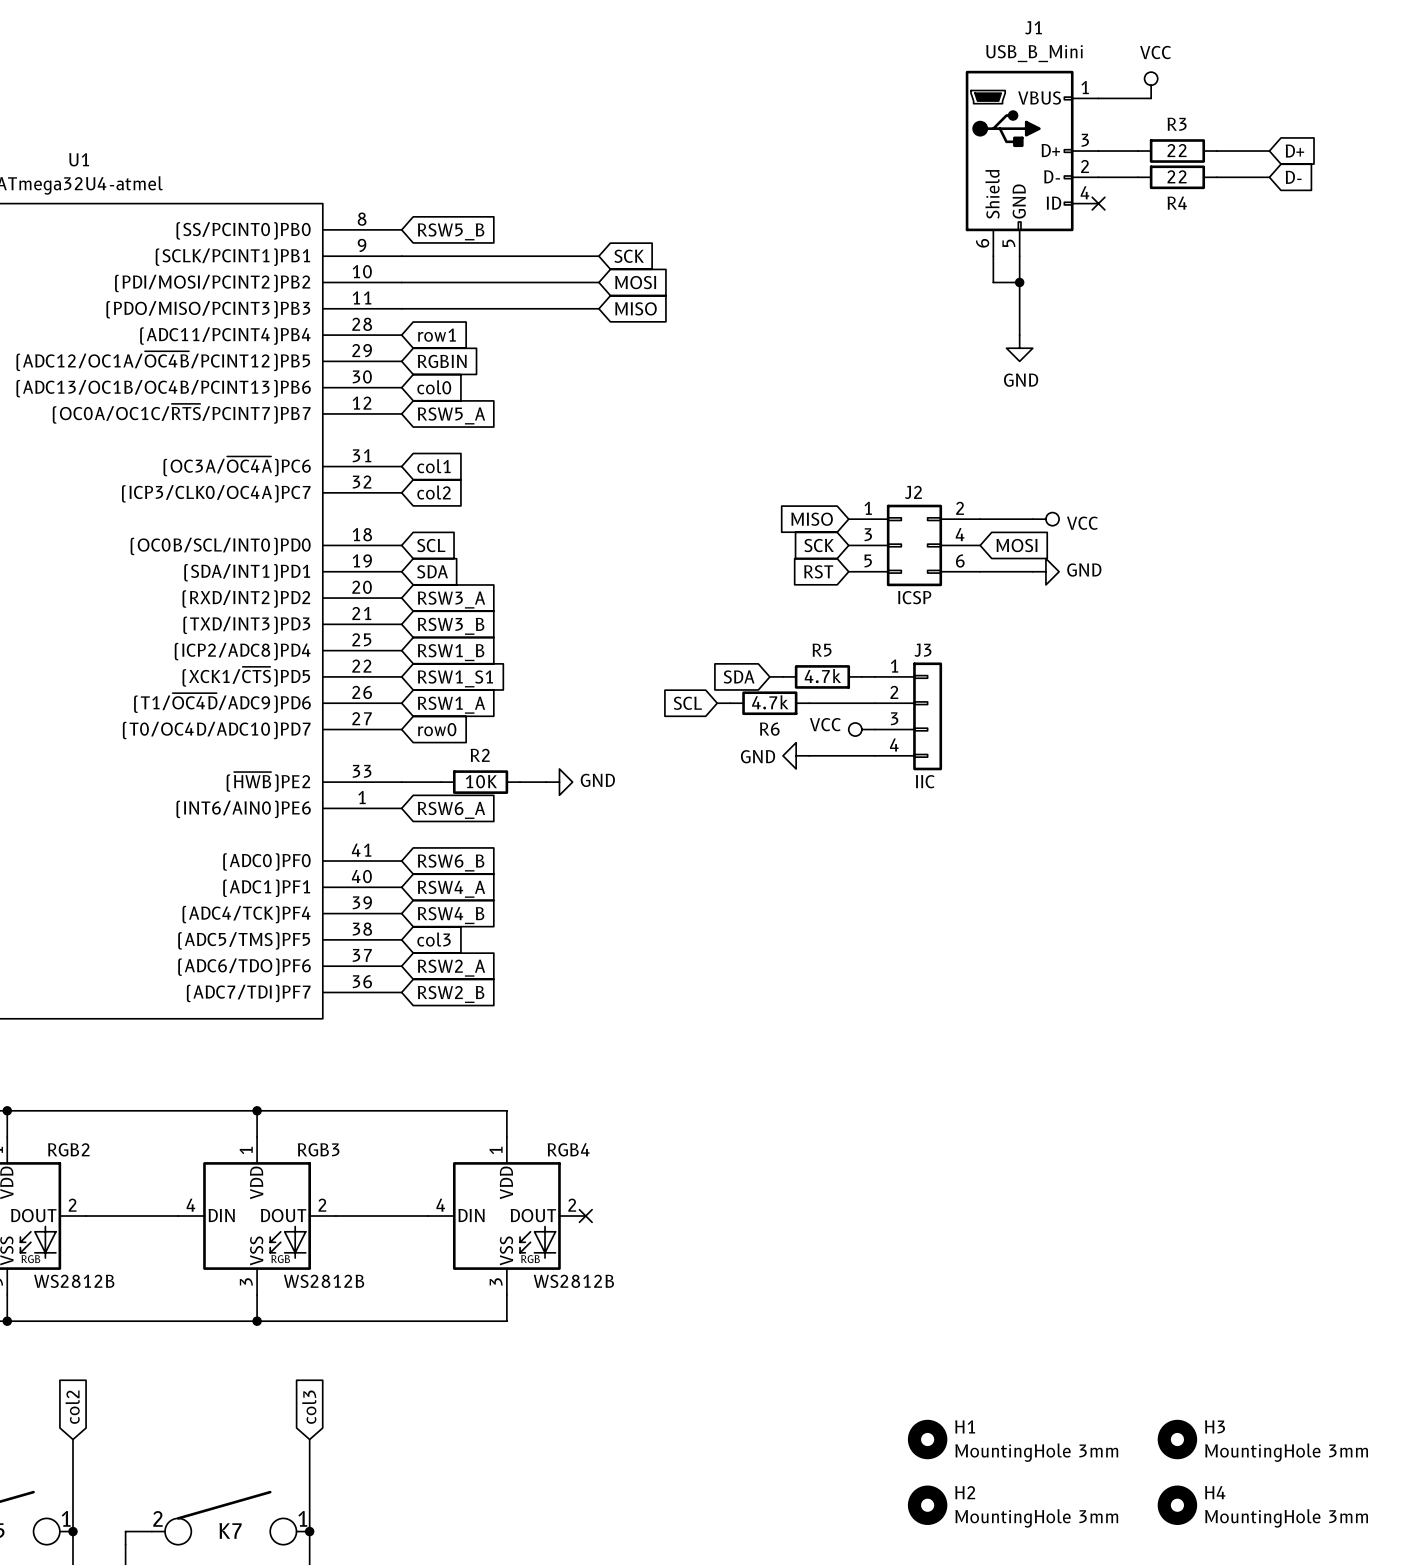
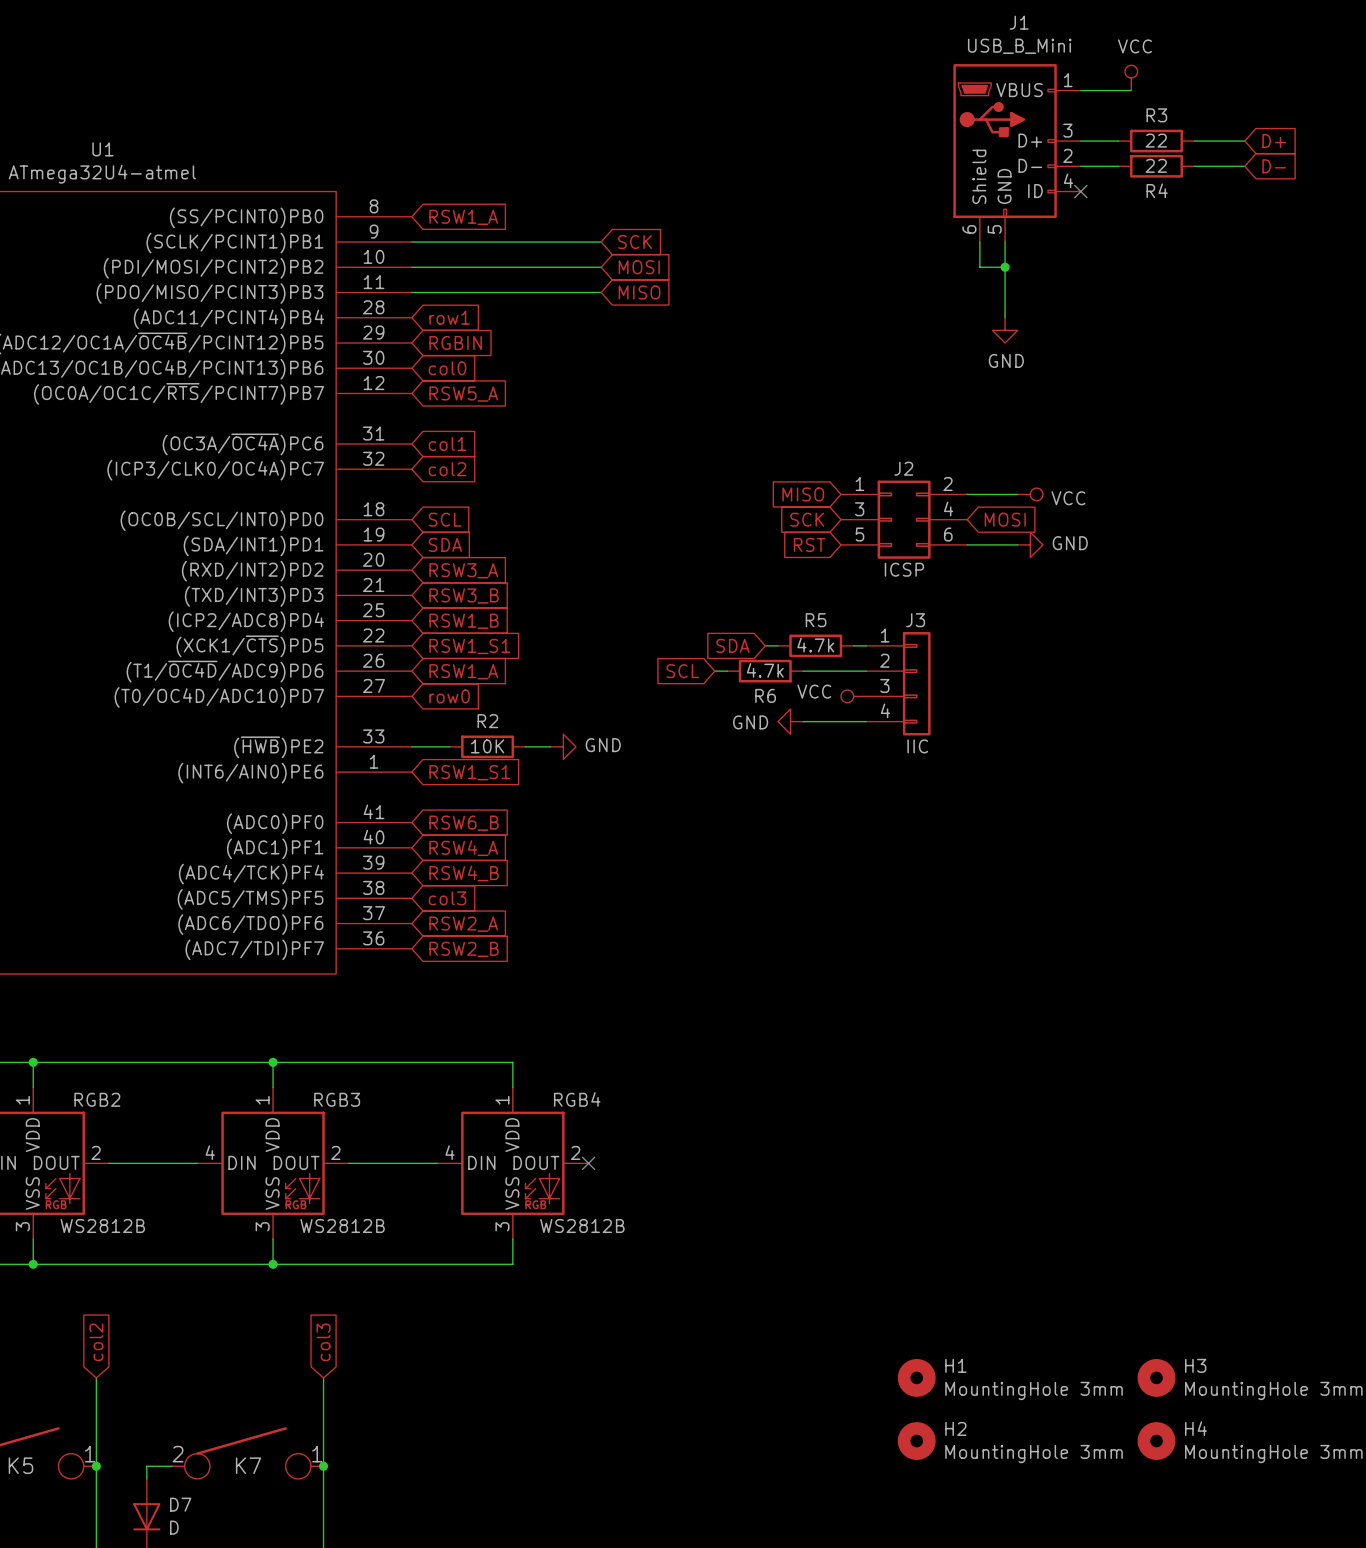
global label: RSW5_B (451, 231) -> RSW1_A (463, 217)
global label: RSW6_A (451, 810) -> RSW1_S1 (469, 772)

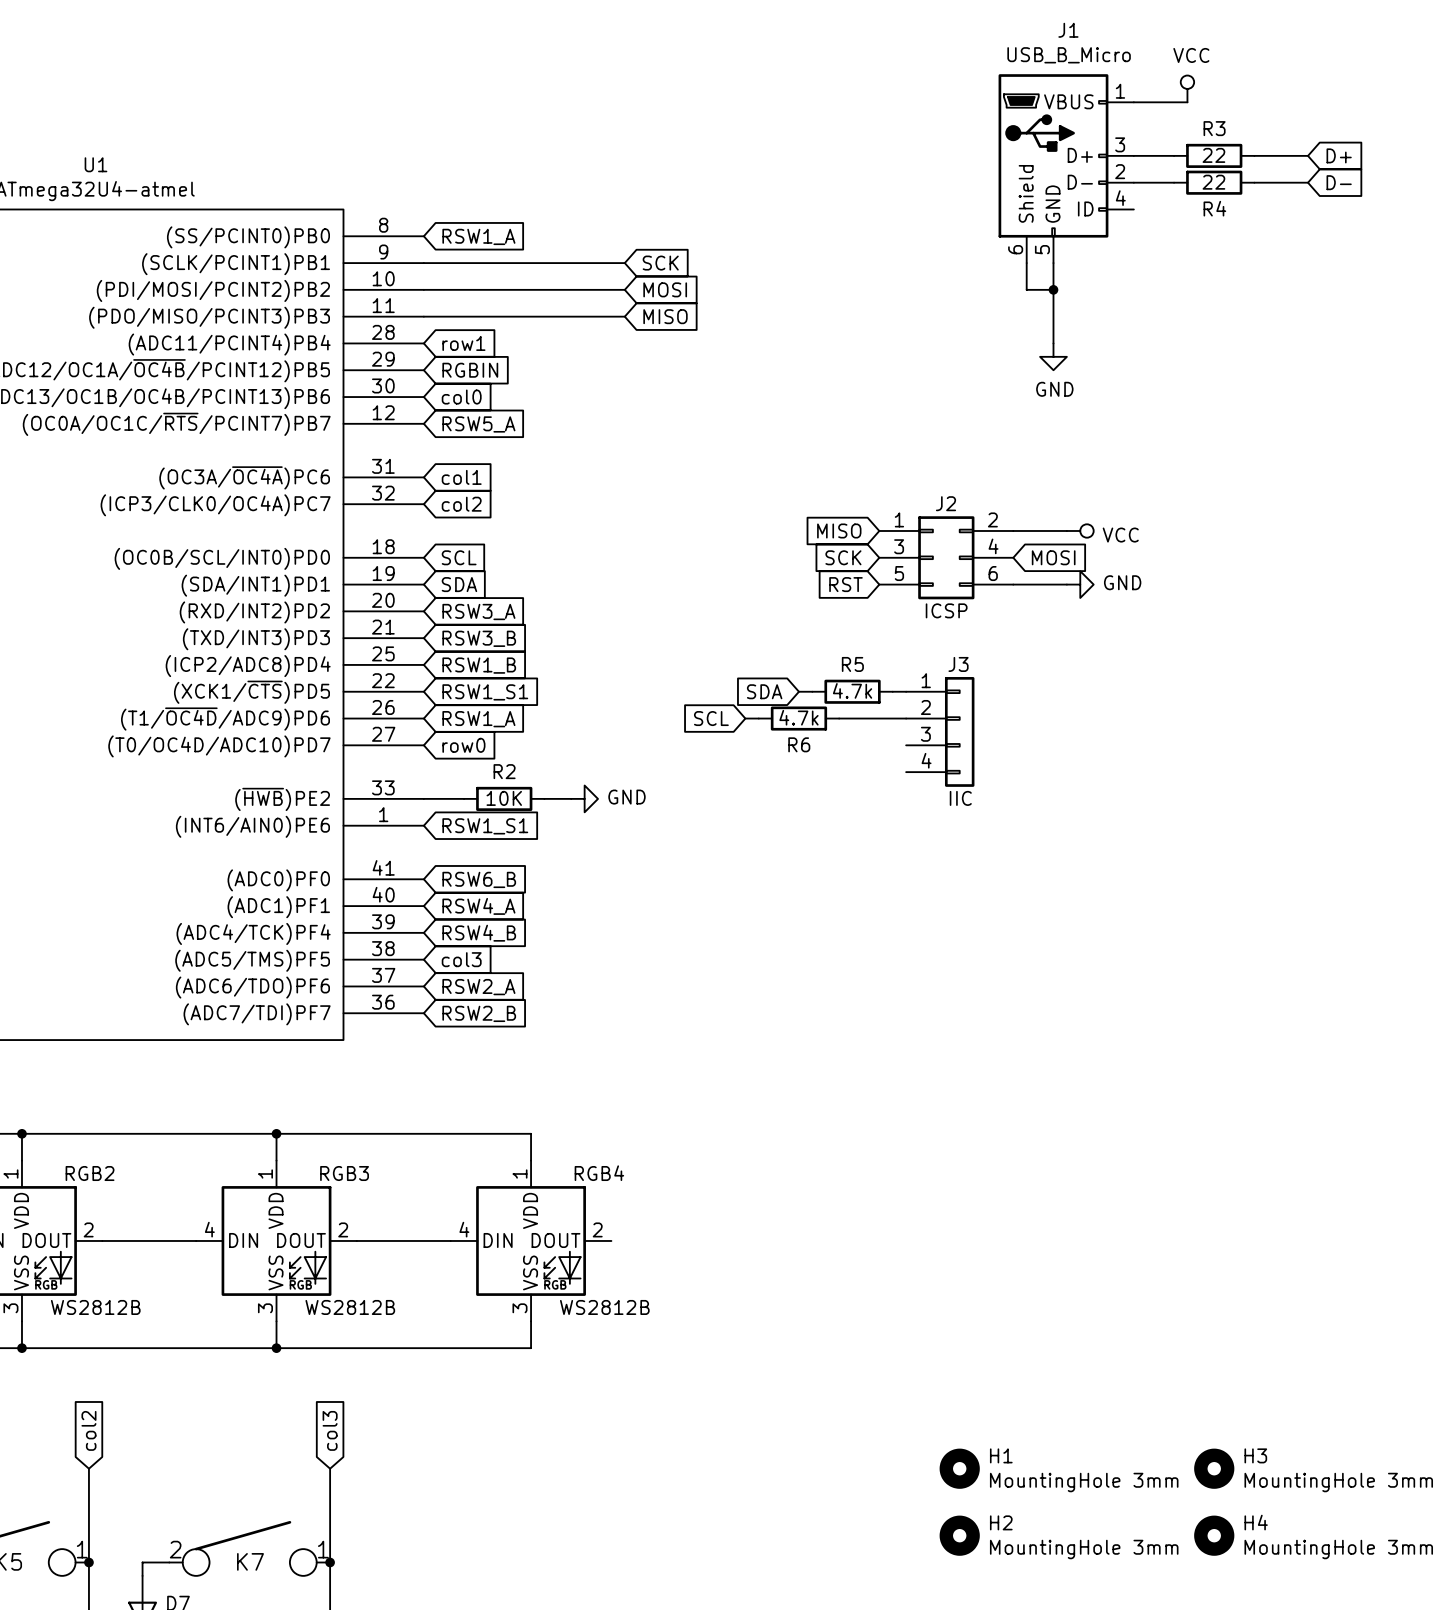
J1 value: USB_B_Mini (1019, 46) -> USB_B_Micro (1069, 55)
no-connect mark: (1080, 191) -> none
power symbol: VCC (853, 696) -> none
power symbol: GND (790, 721) -> none
wire: (803, 721) (866, 721) -> none
no-connect mark: (588, 1163) -> none

